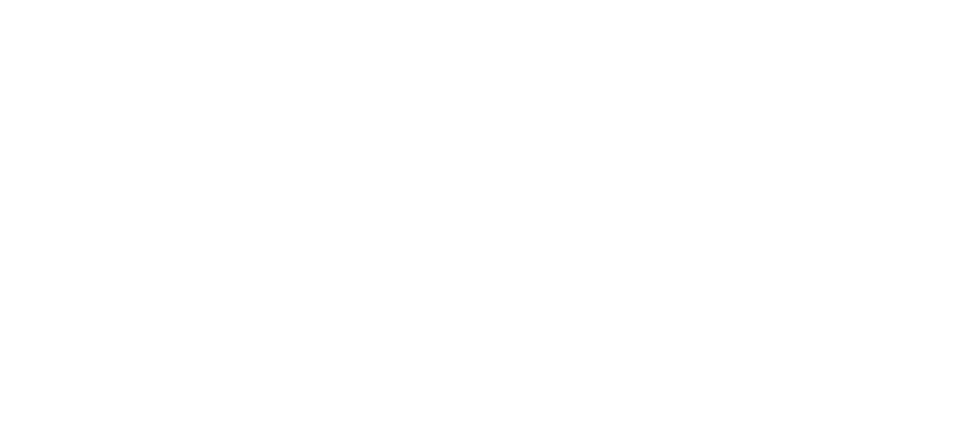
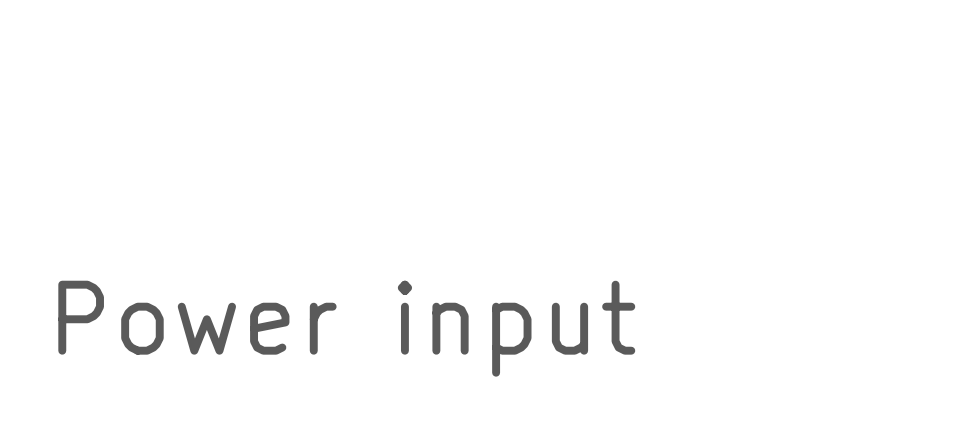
text: none -> Power input (346, 328)

